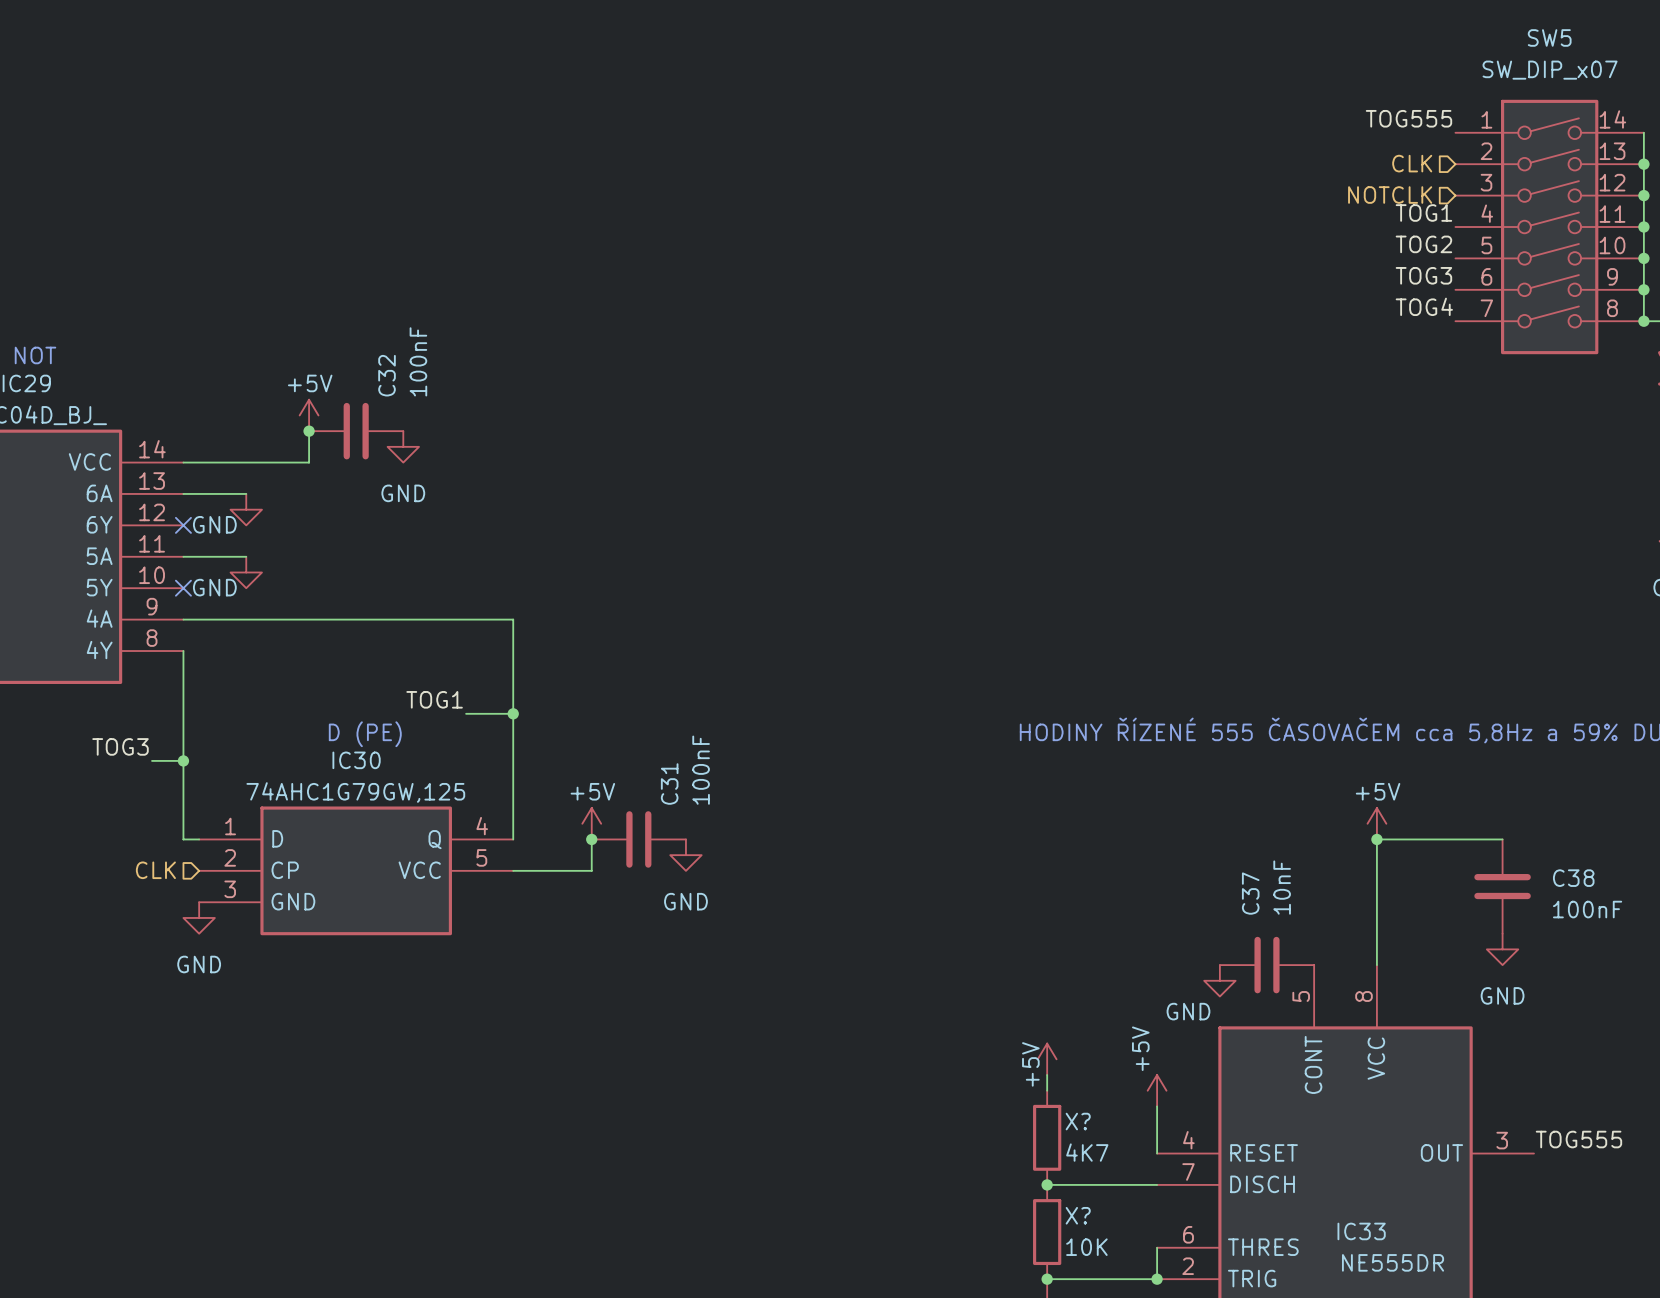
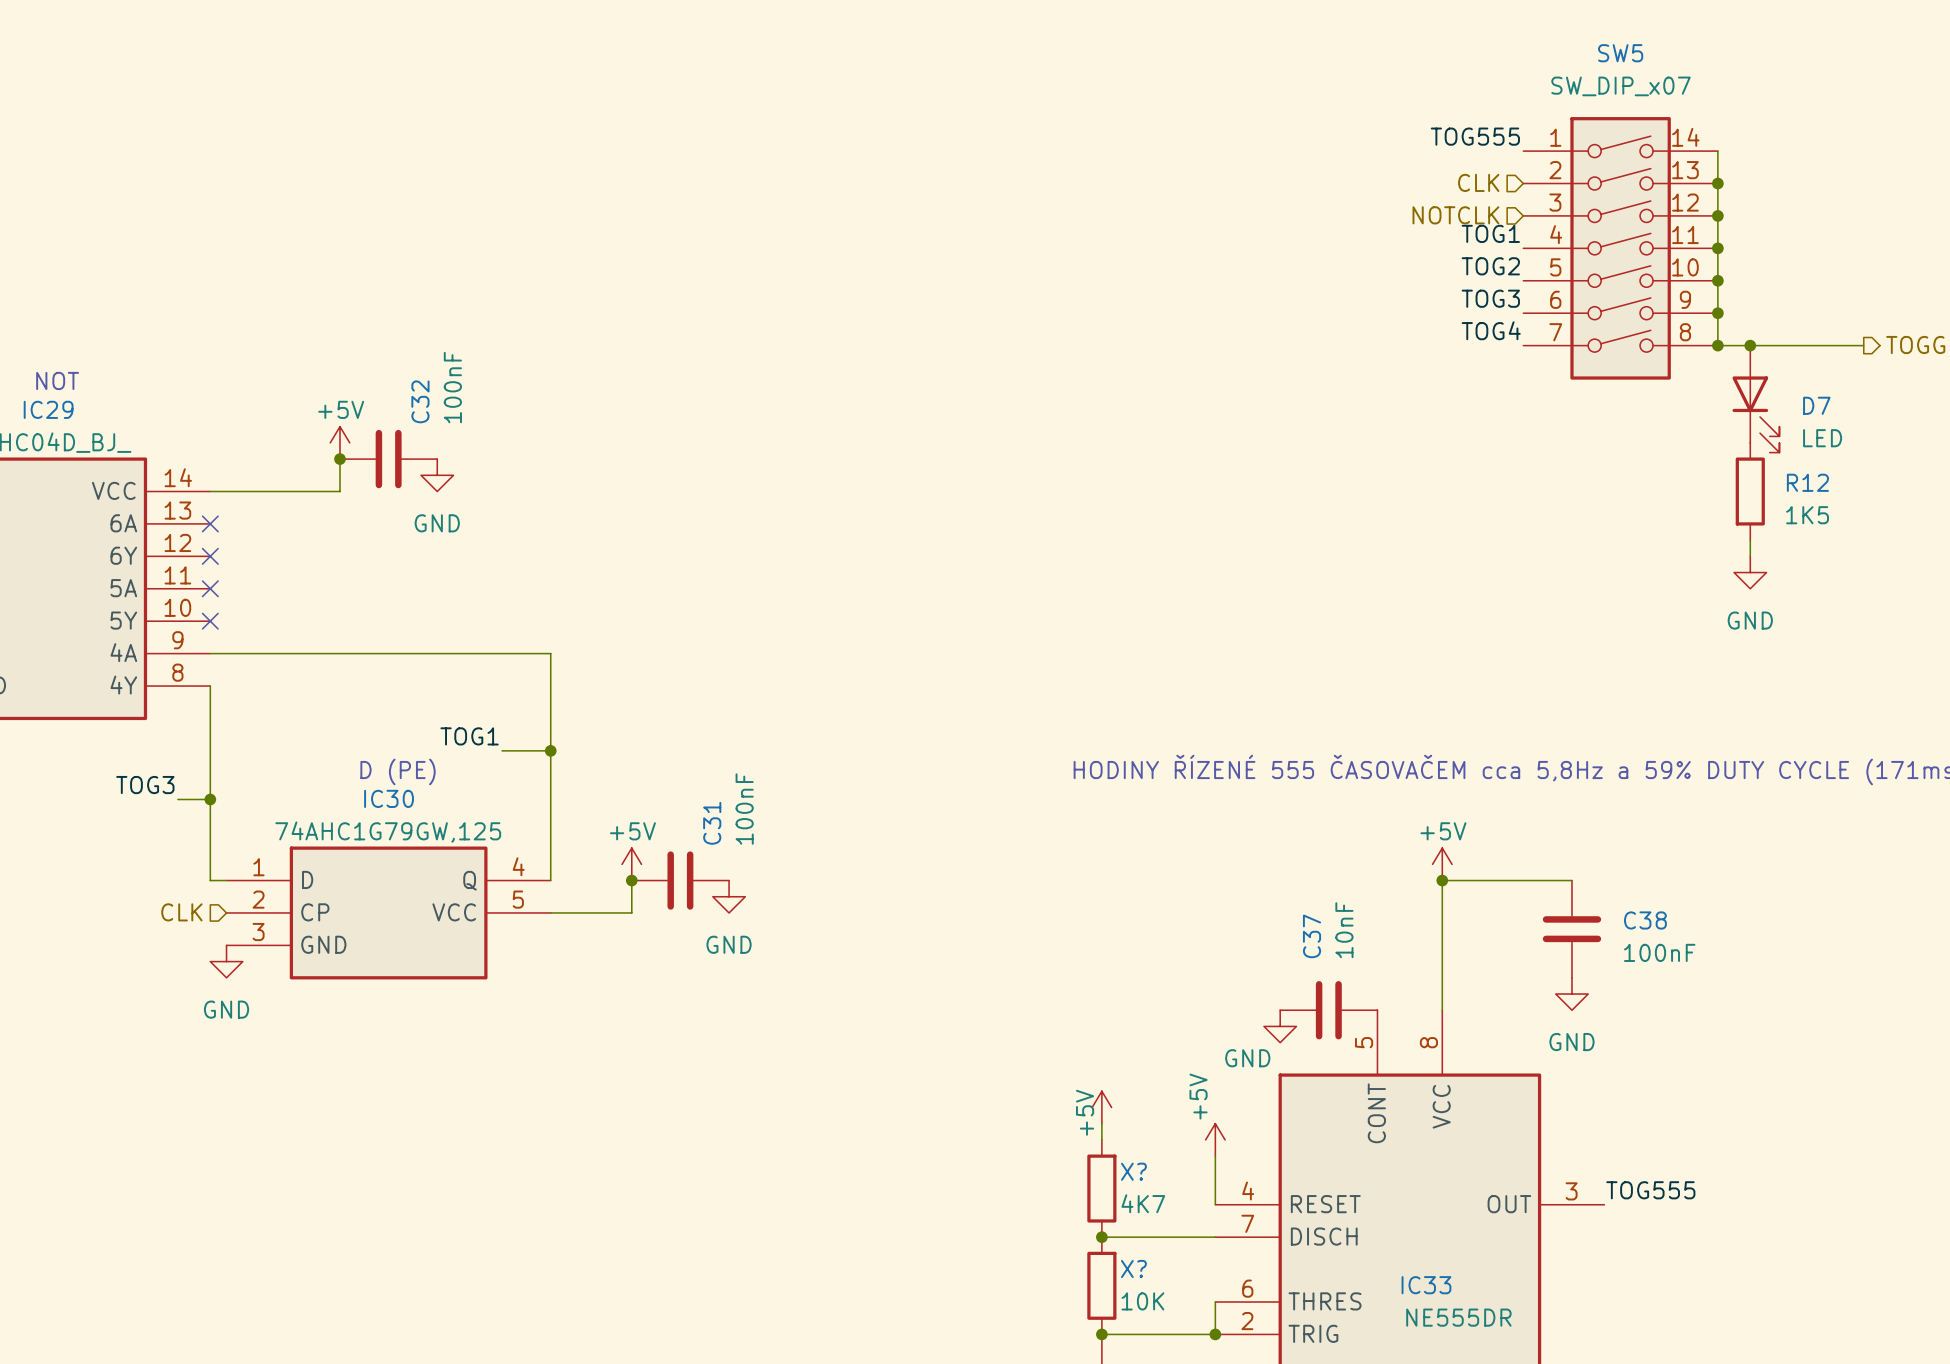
wire: (183, 493) (246, 493) -> none
no-connect mark: none -> (210, 523)
power symbol: GND (246, 509) -> none
wire: (183, 556) (246, 556) -> none
no-connect mark: none -> (210, 588)
power symbol: GND (246, 572) -> none

